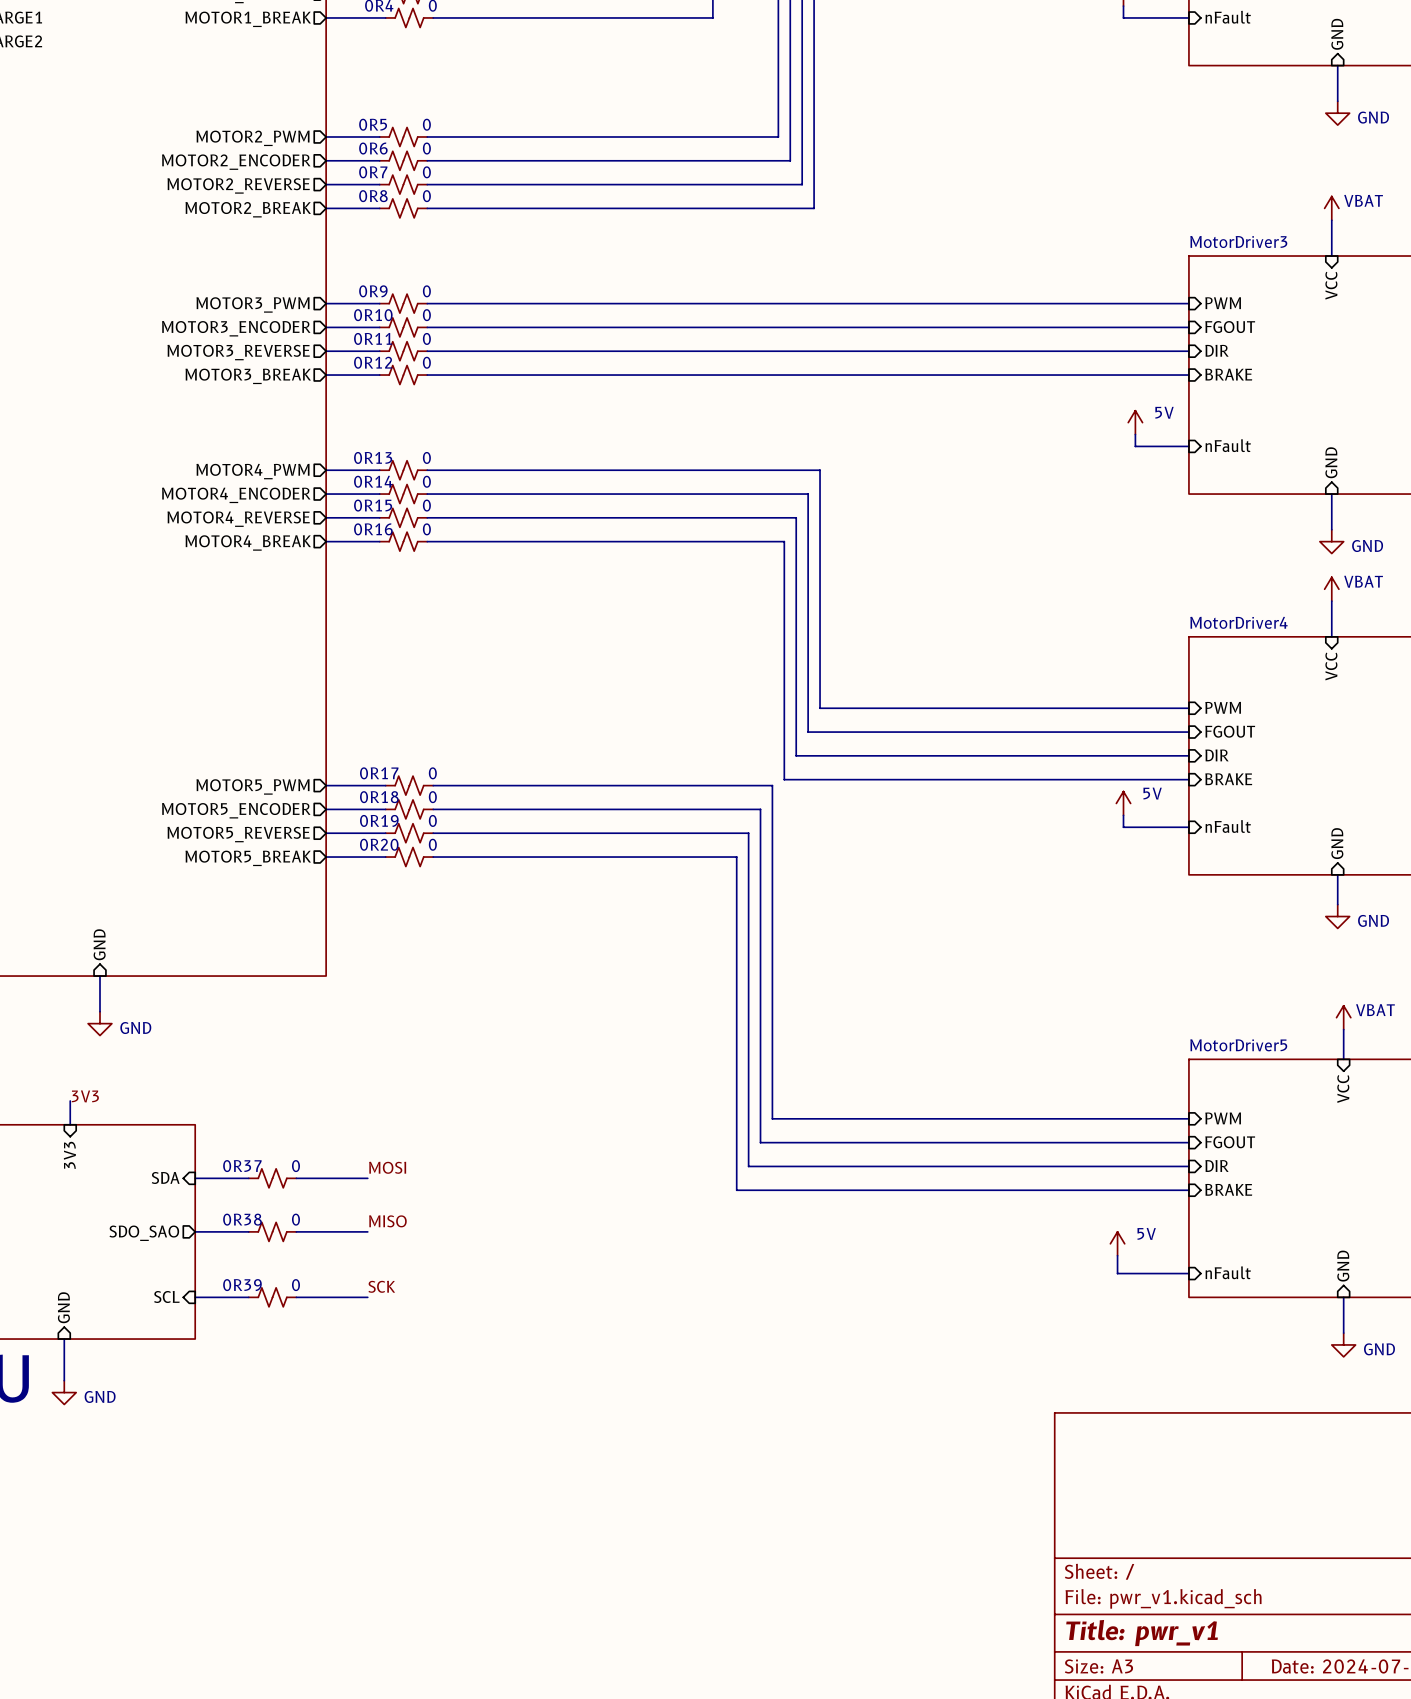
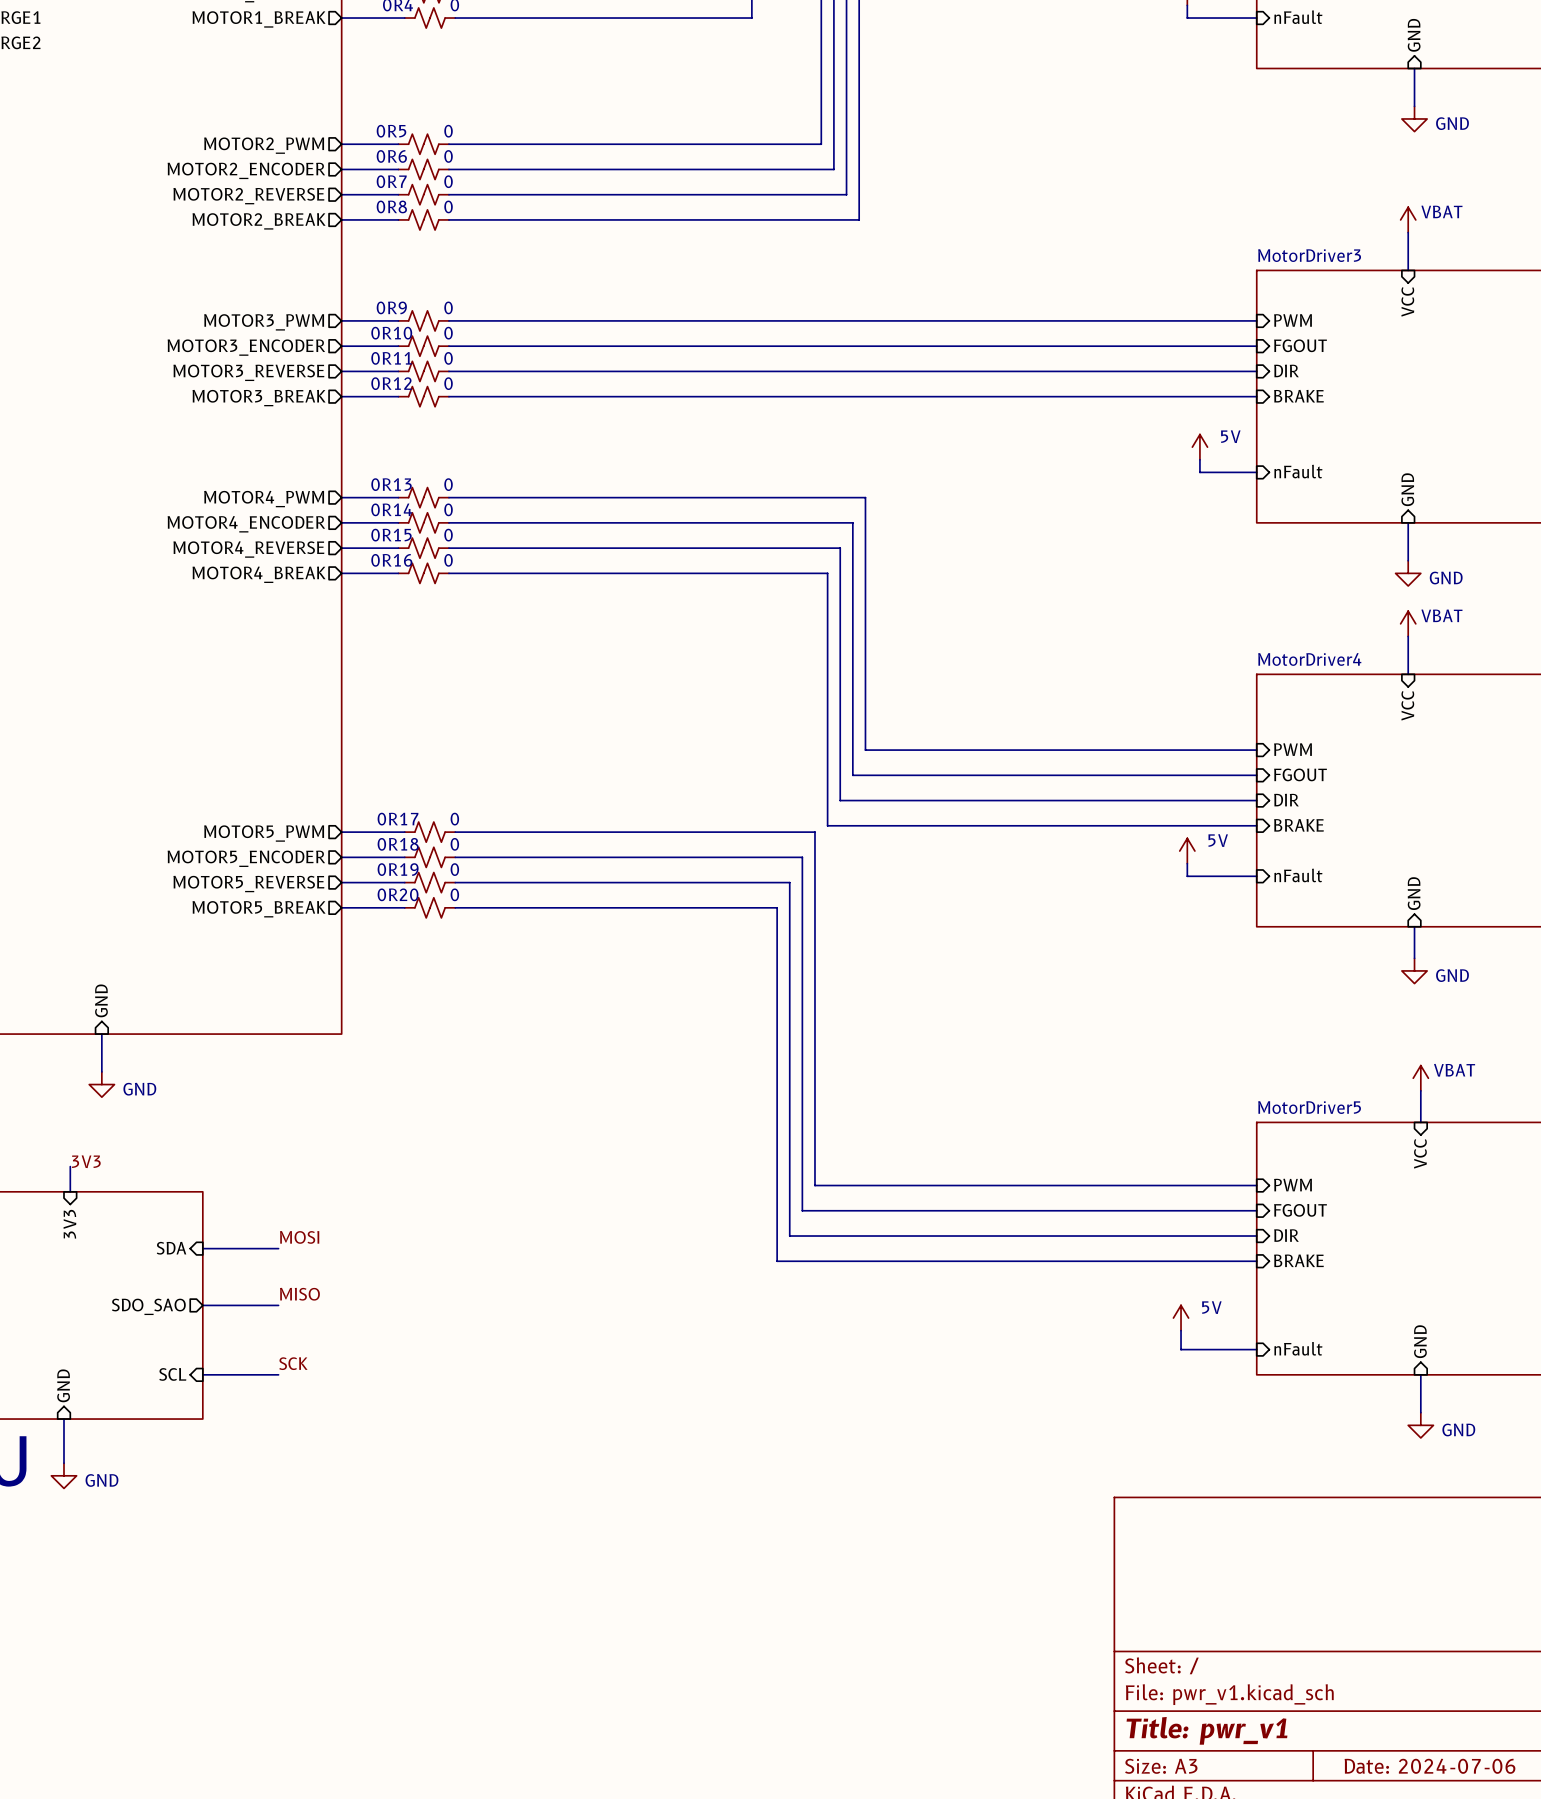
label position: MOSI (387, 1167) -> MOSI (299, 1237)
0R37: 0 (272, 1178) -> none
wire: (296, 1178) (367, 1178) -> none
label position: MISO (387, 1221) -> MISO (299, 1294)
0R38: 0 (272, 1231) -> none
wire: (296, 1231) (367, 1231) -> none
label position: SCK (381, 1286) -> SCK (293, 1363)
0R39: 0 (272, 1297) -> none
wire: (296, 1297) (367, 1297) -> none

